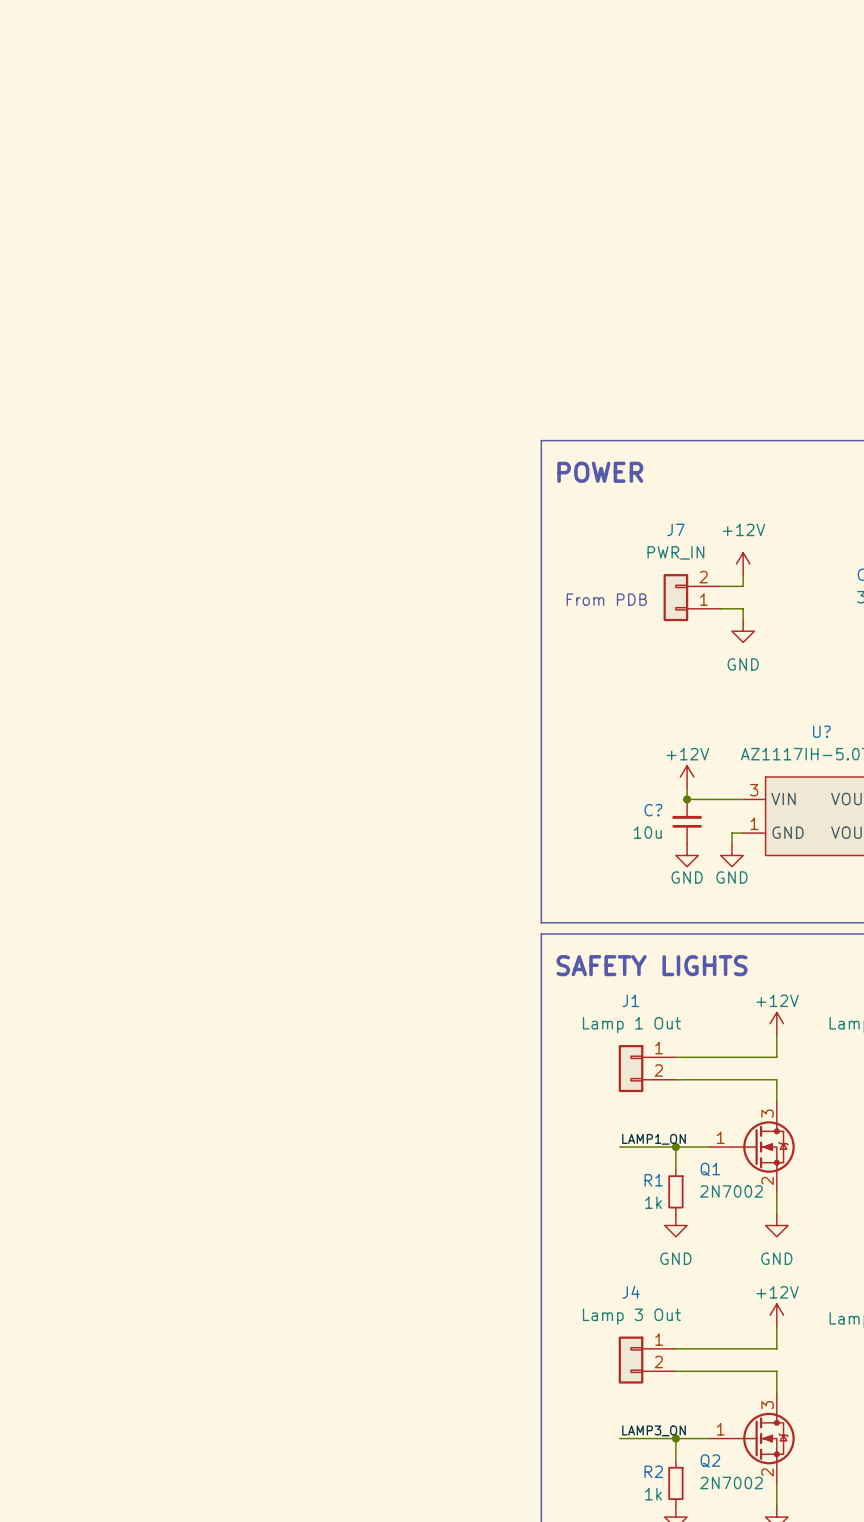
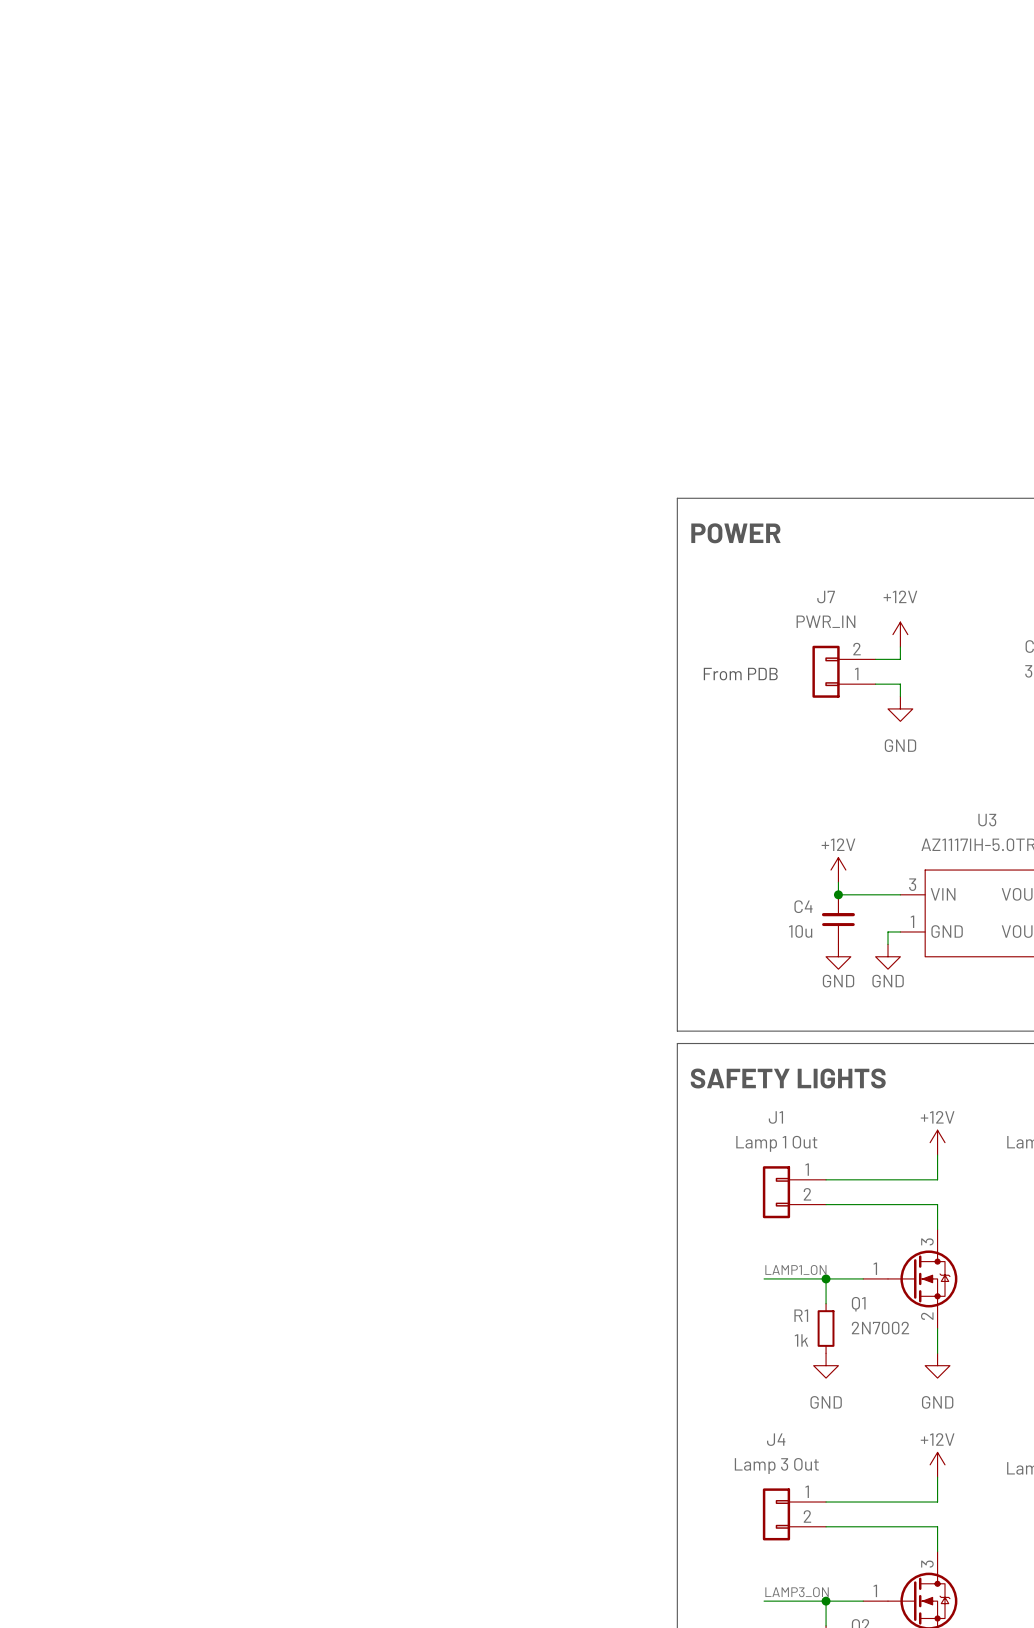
U? name: U? (821, 731) -> U3 (987, 820)
C? name: C? (653, 810) -> C4 (803, 906)

